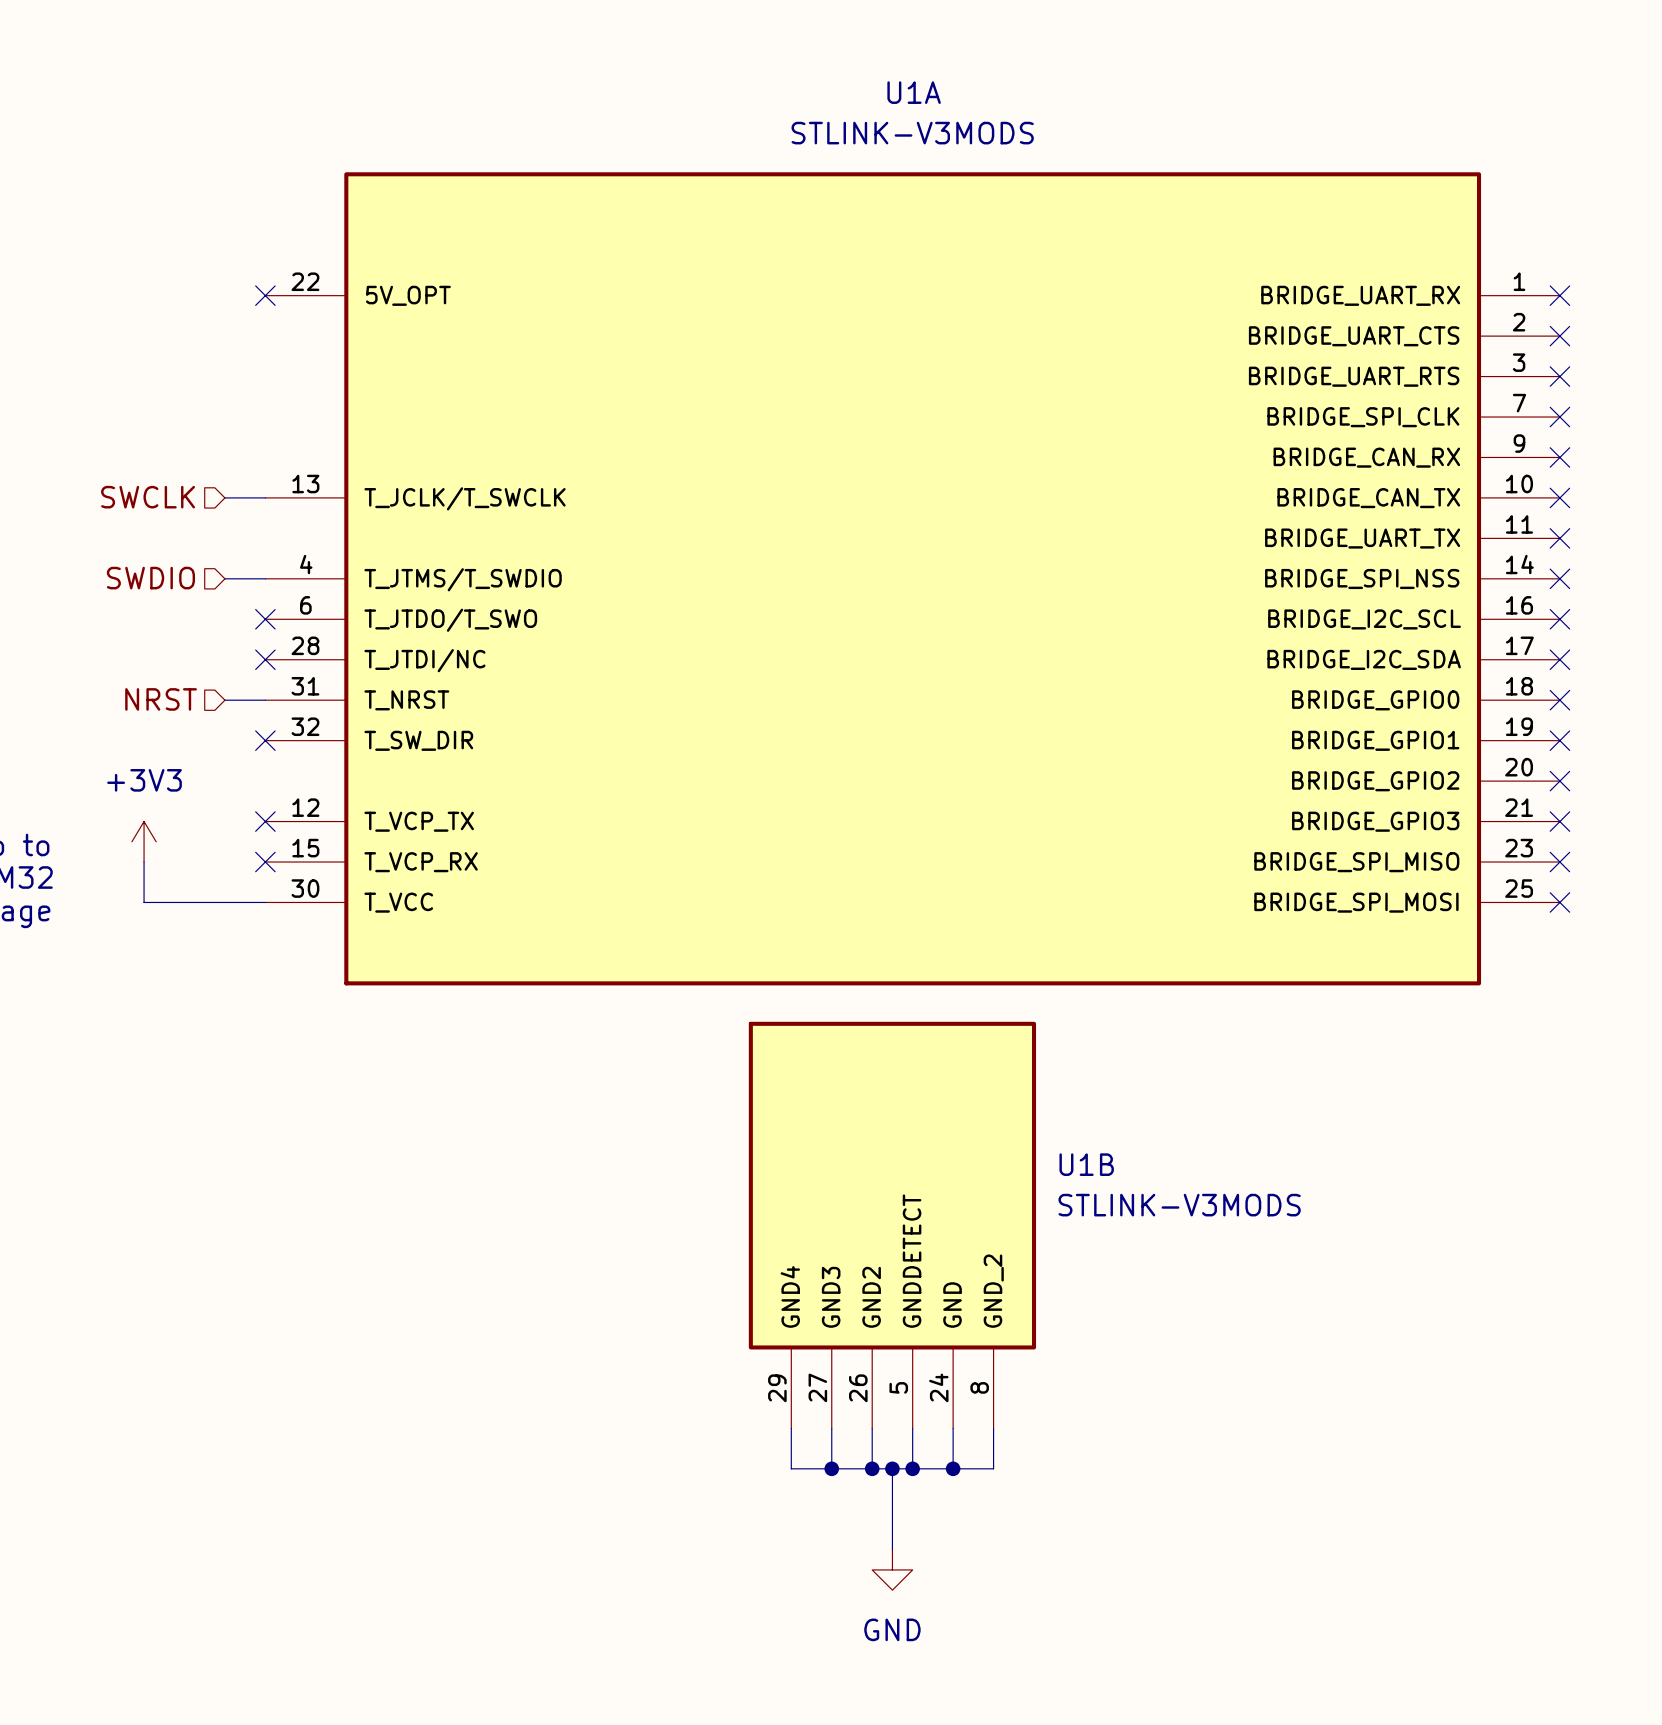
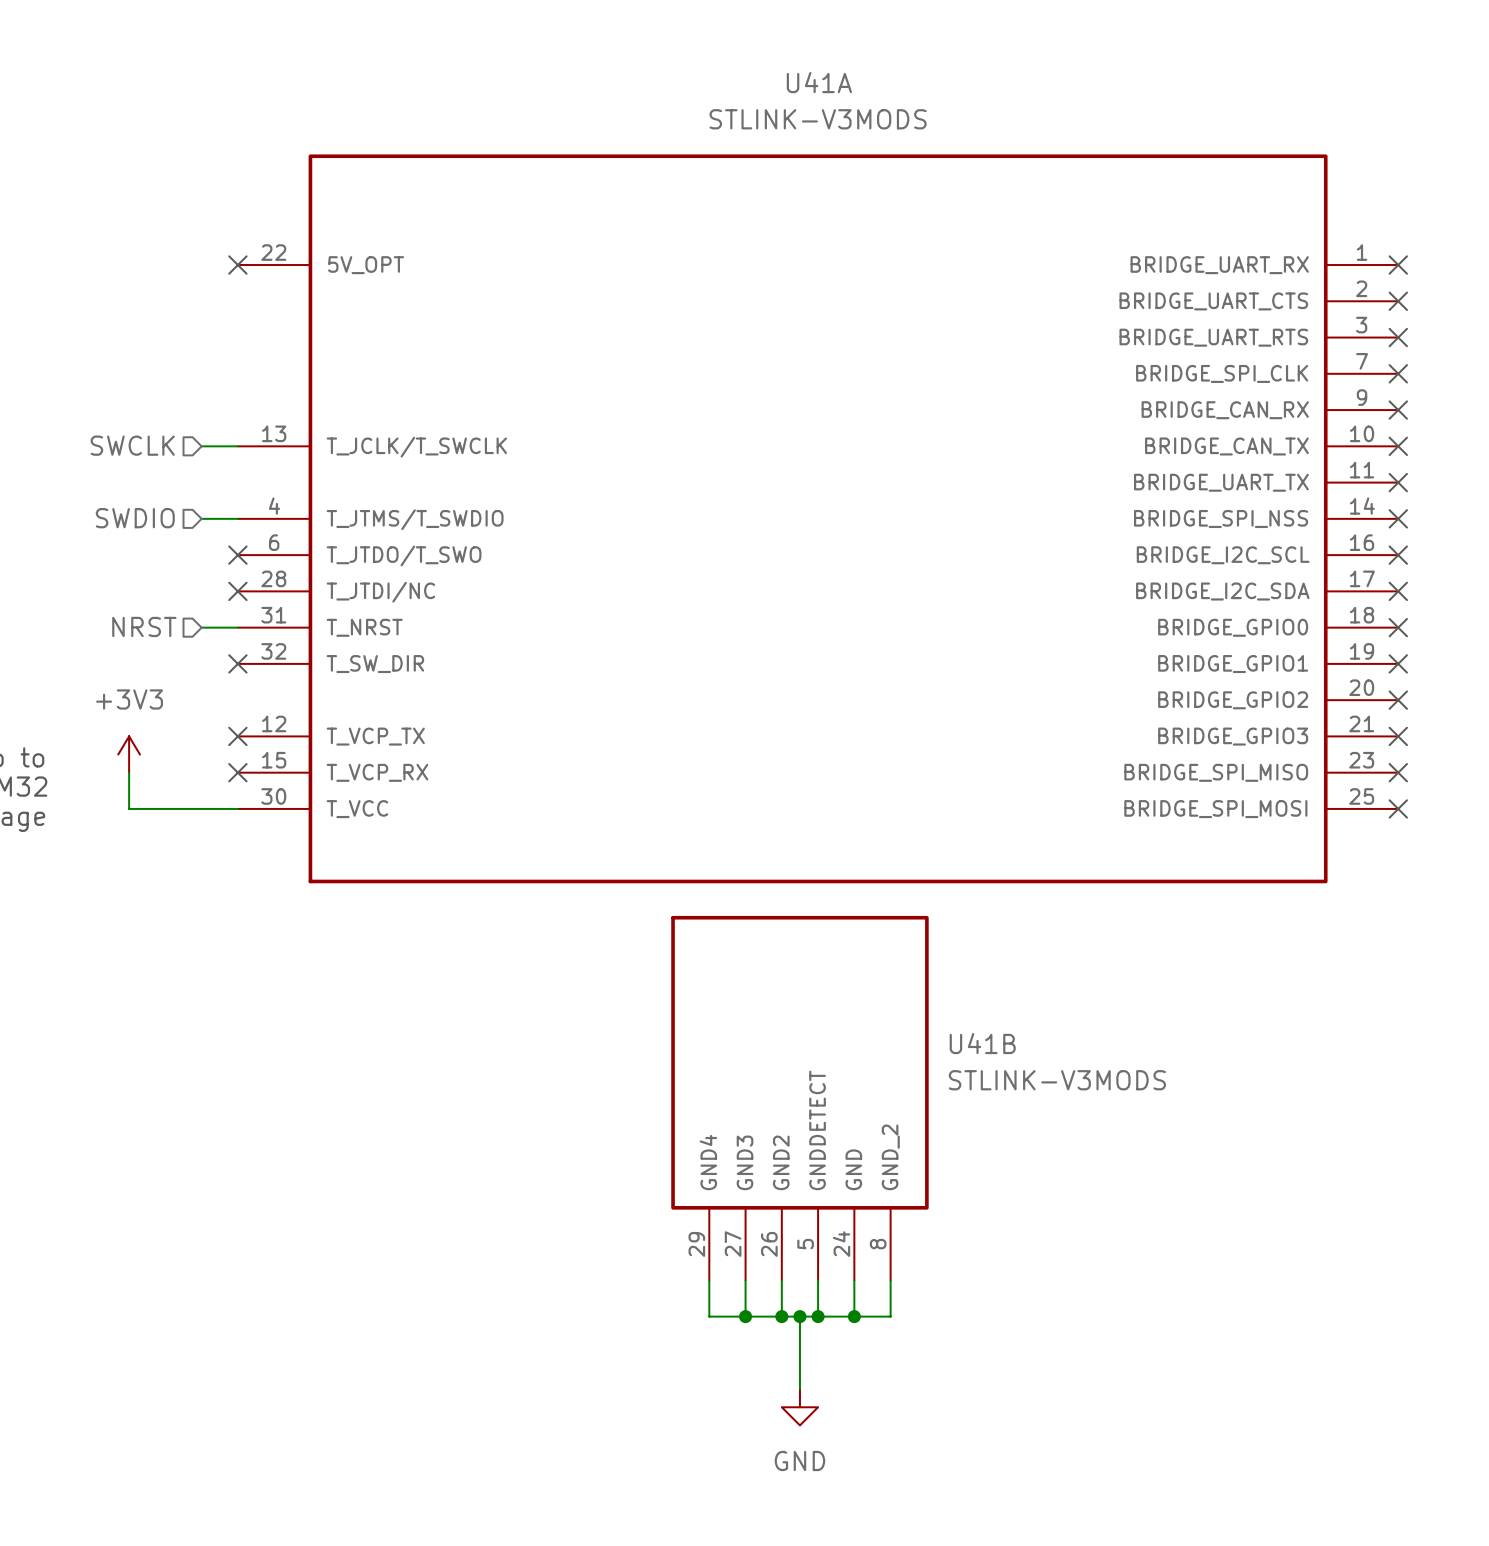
U1A name: U1A (914, 92) -> U41A (819, 82)
U1B name: U1B (1086, 1164) -> U41B (982, 1043)

